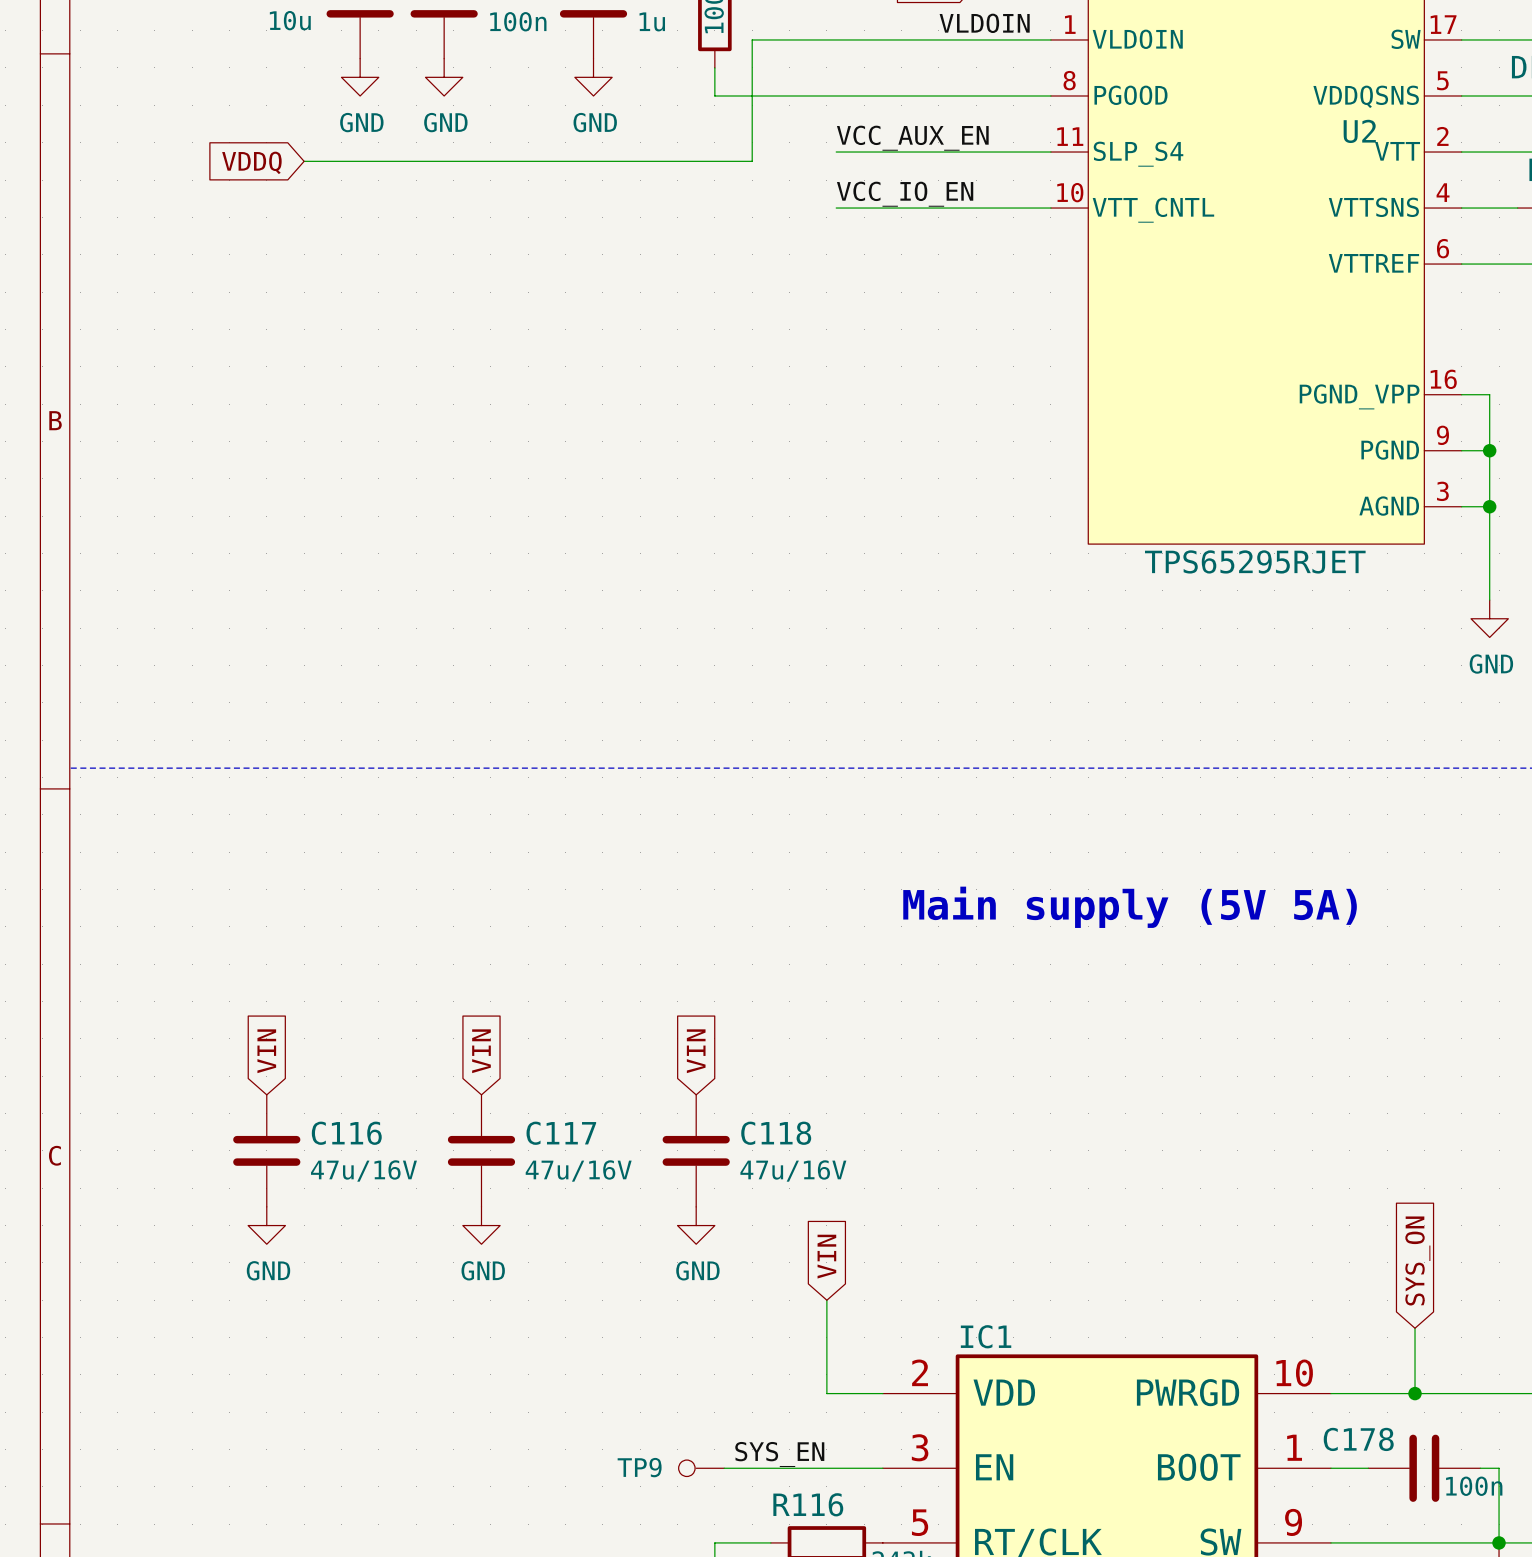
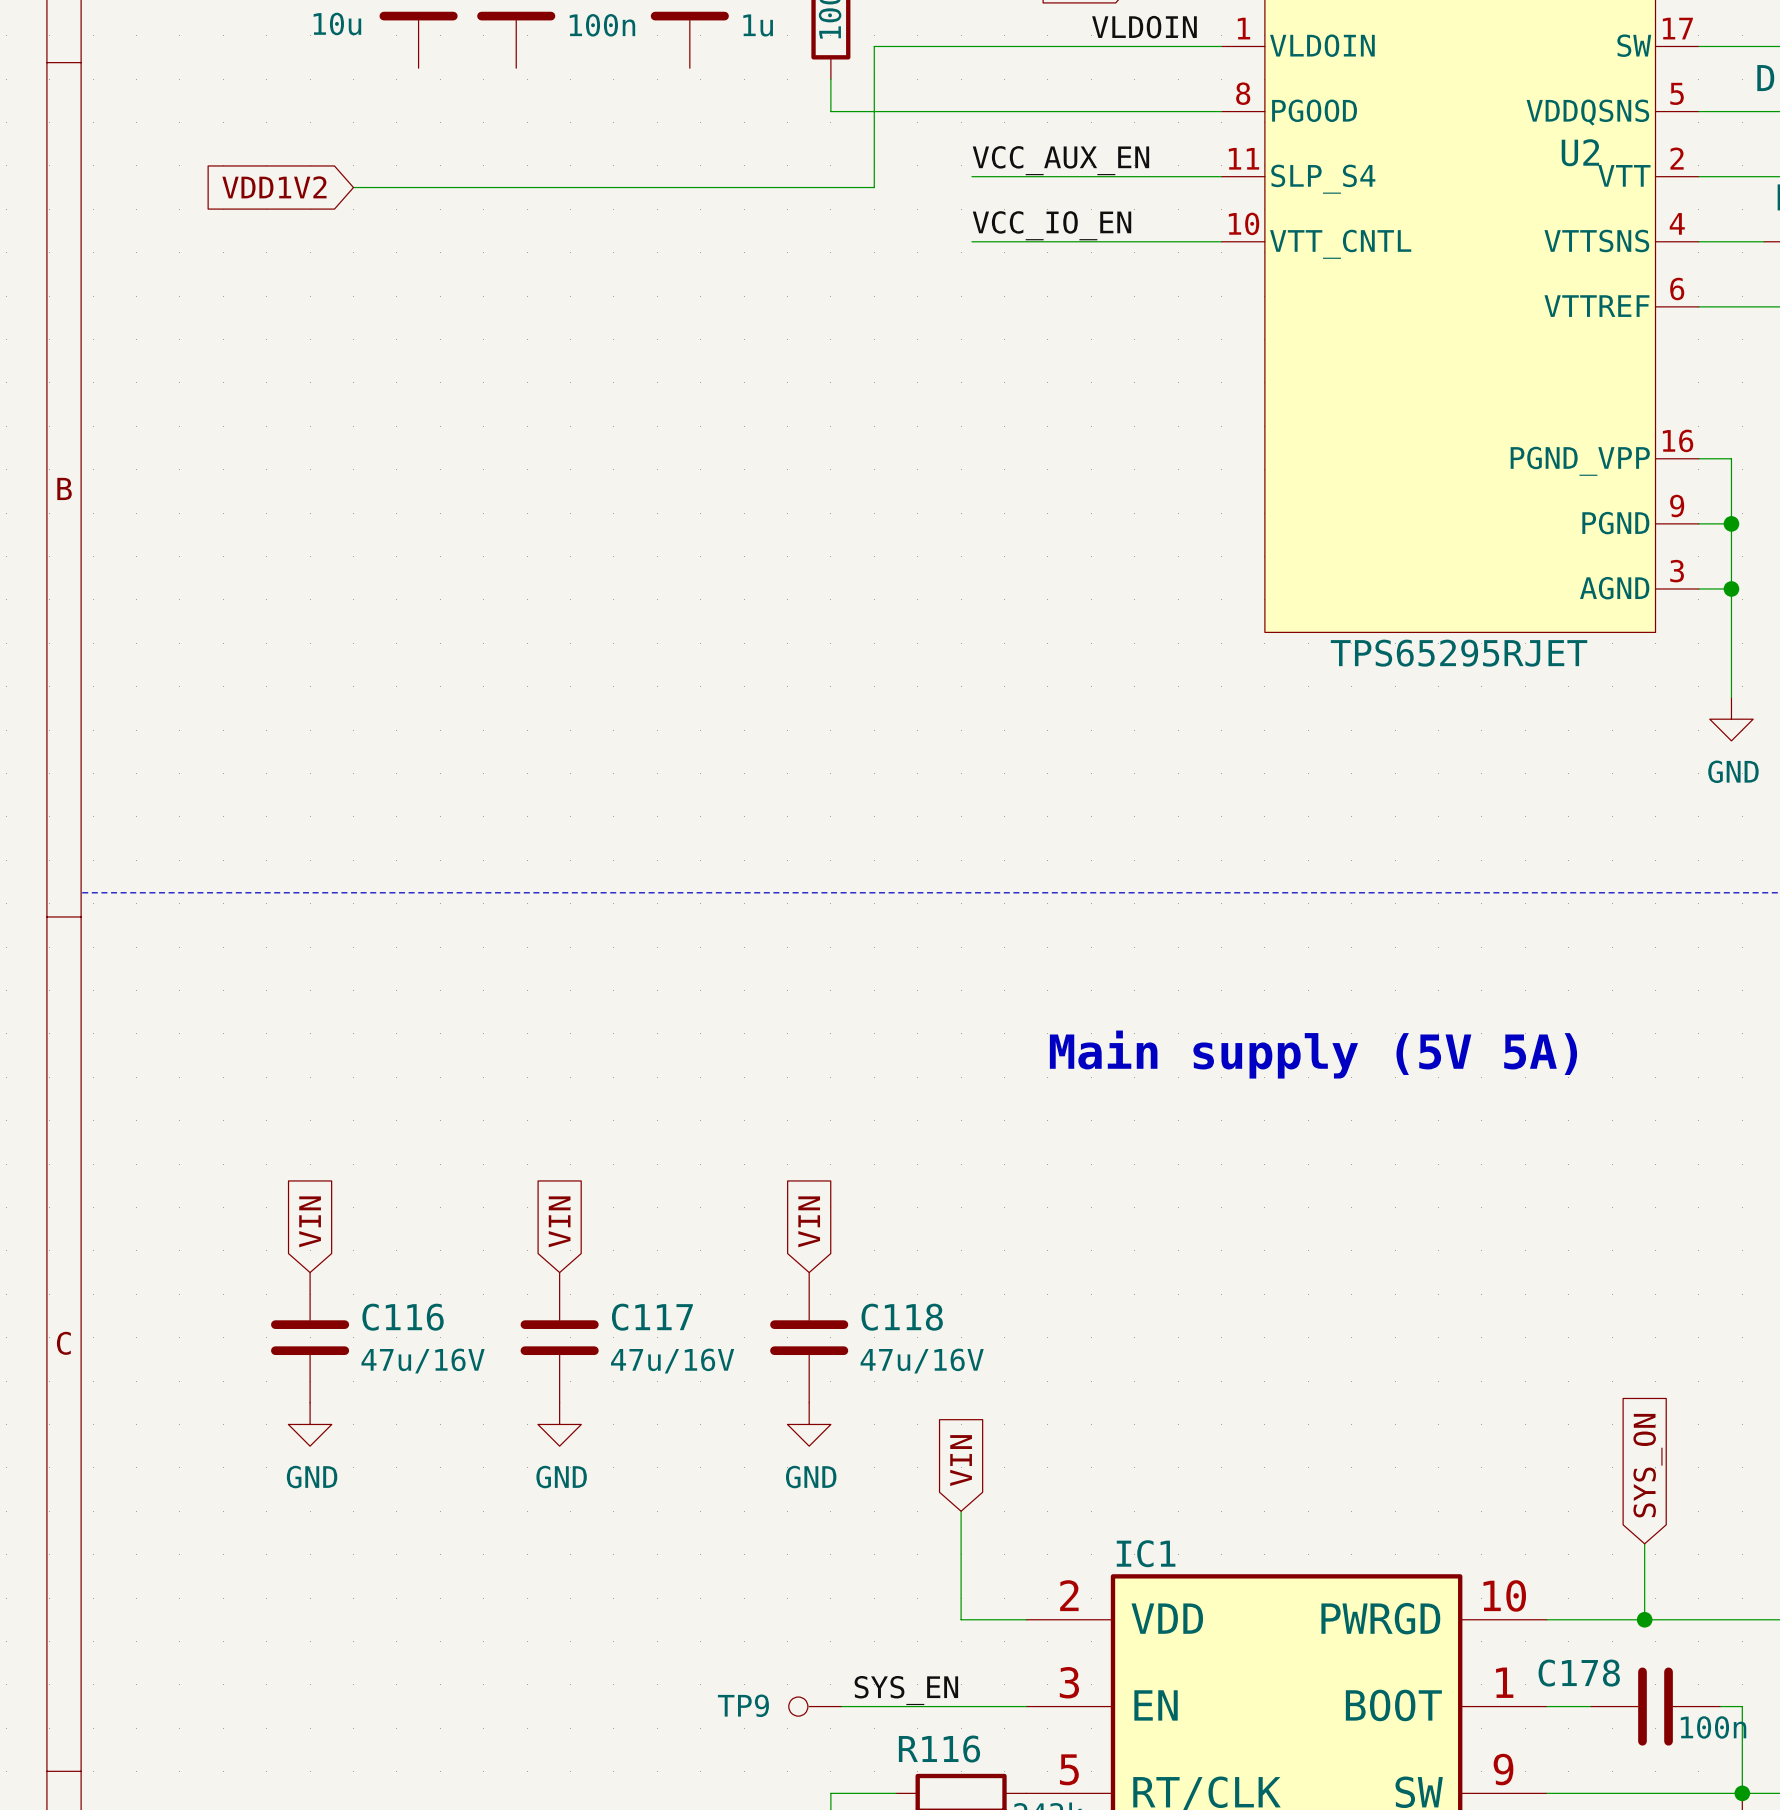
power symbol: GND (360, 77) -> none
power symbol: GND (444, 77) -> none
power symbol: GND (593, 77) -> none
global label: VDDQ (251, 162) -> VDD1V2 (274, 187)

